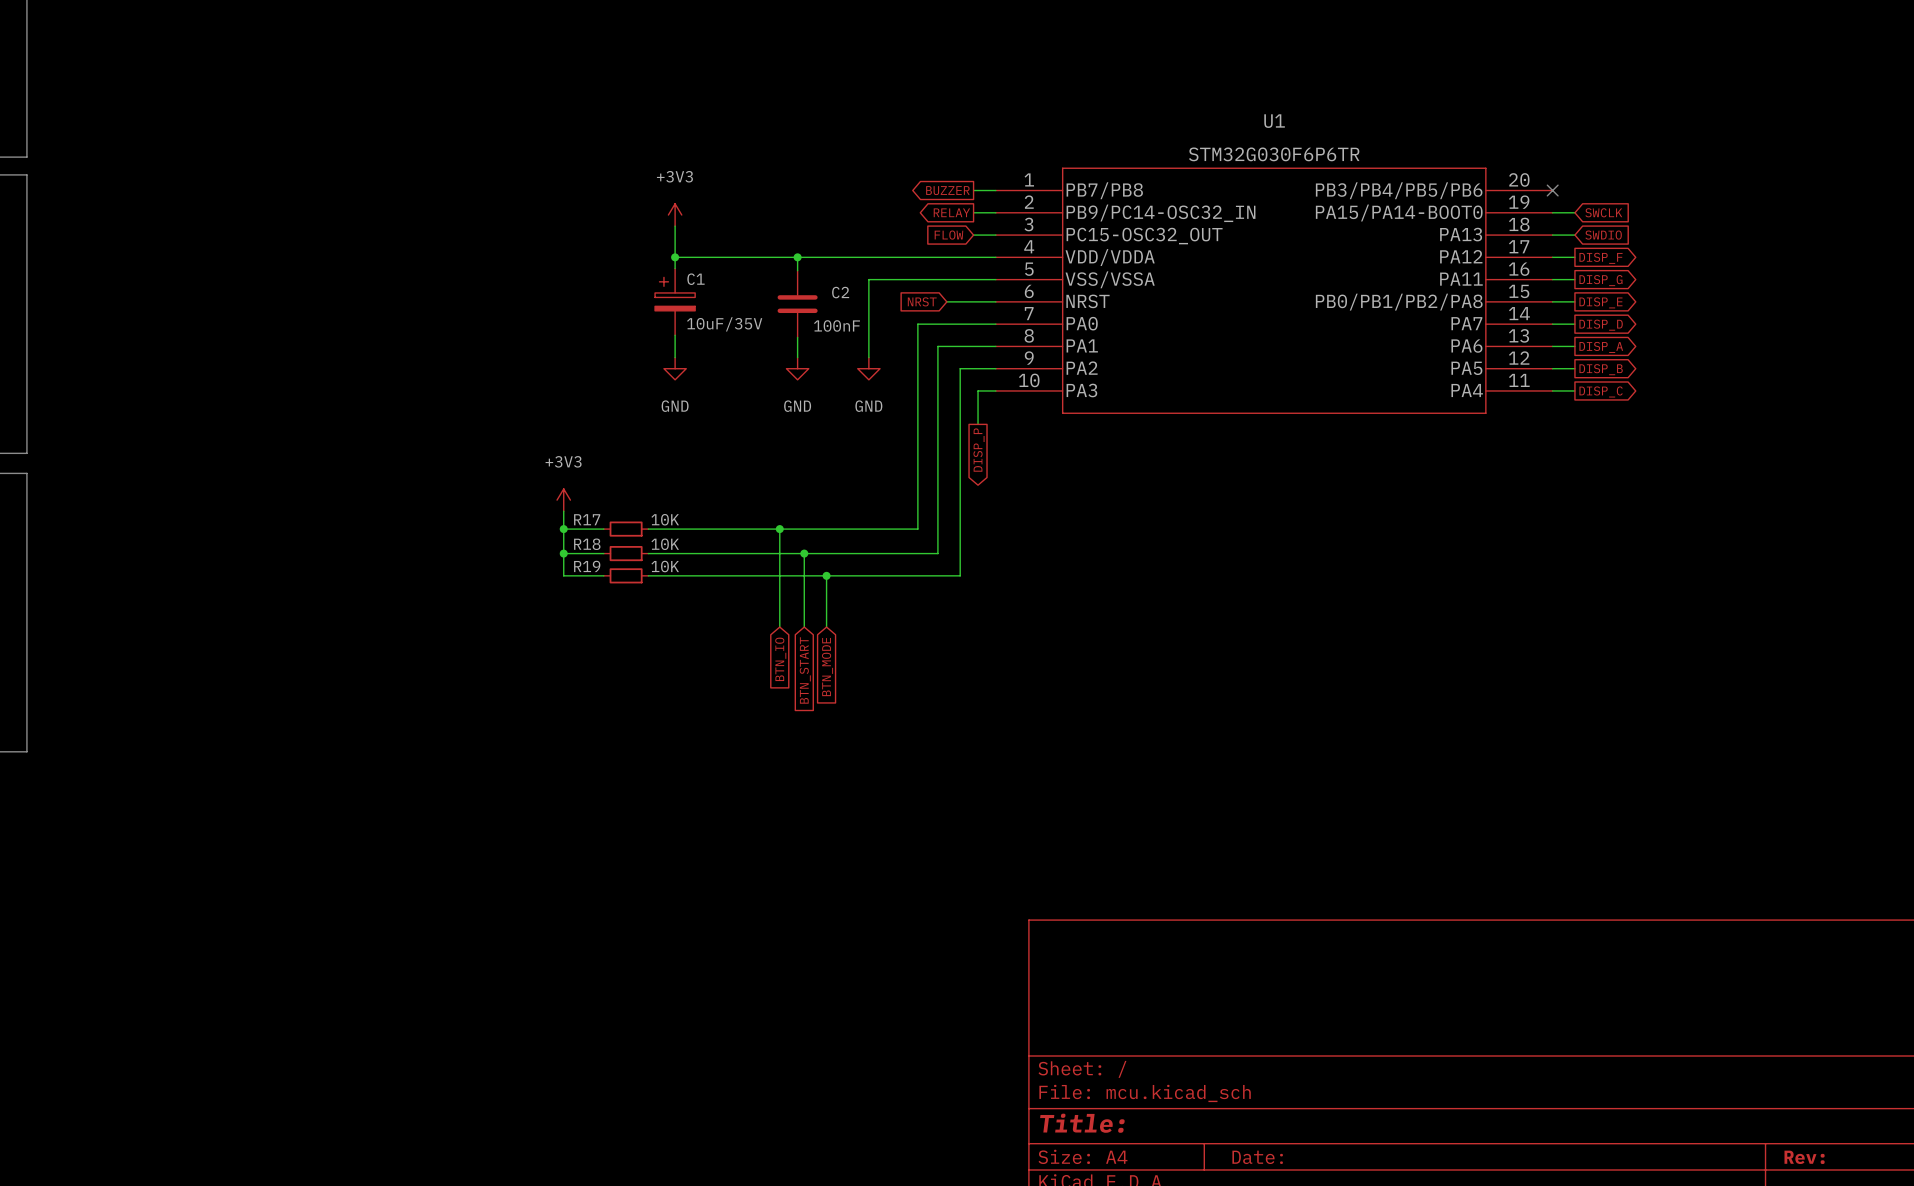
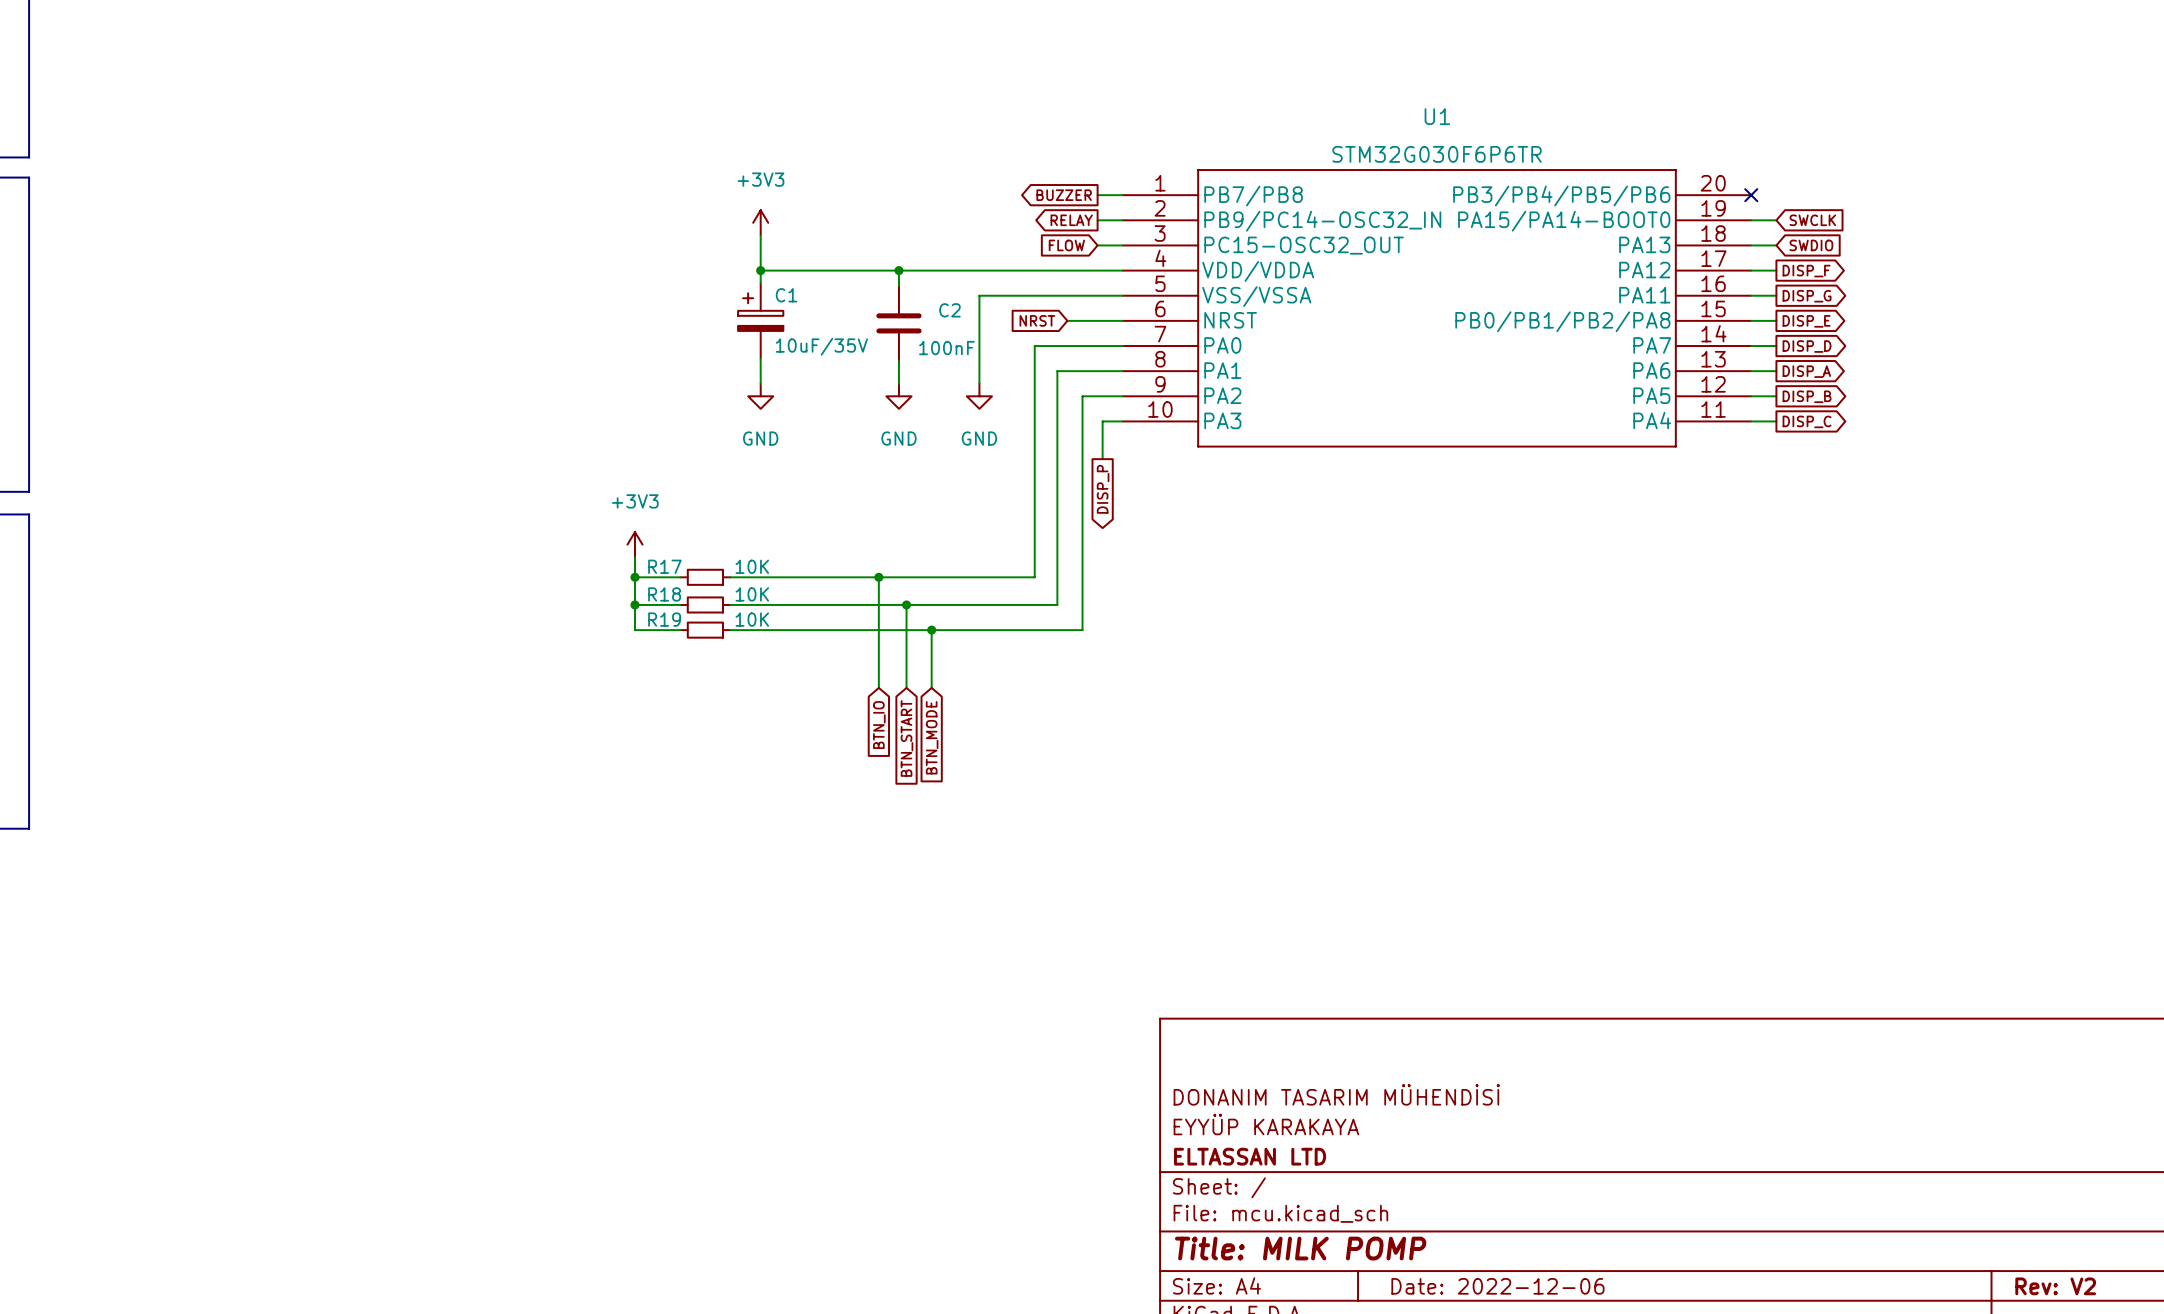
title block: none -> DONANIM TASARIM MÜHENDİSİ (1336, 1094)
title block: none -> EYYÜP KARAKAYA (1266, 1124)
title block: none -> ELTASSAN LTD (1250, 1156)
title block: Title: (1082, 1123) -> Title: MILK POMP (1300, 1248)
title block: Date: (1257, 1157) -> Date: 2022-12-06 (1497, 1286)
title block: Rev: (1804, 1157) -> Rev: V2 (2055, 1286)

